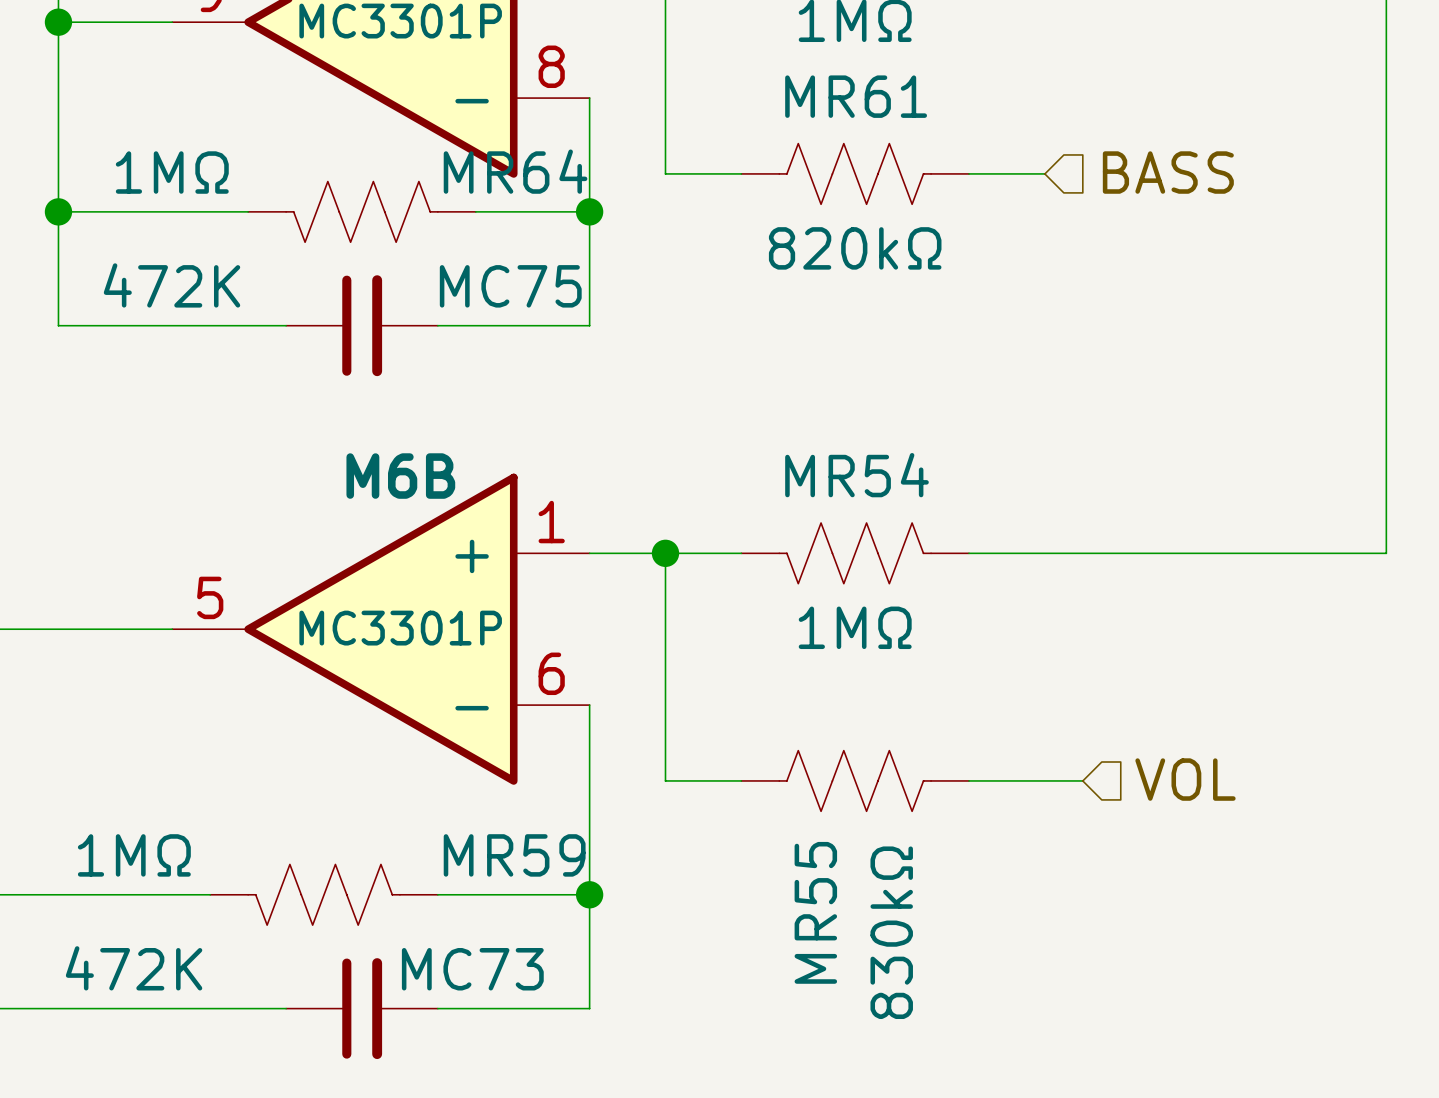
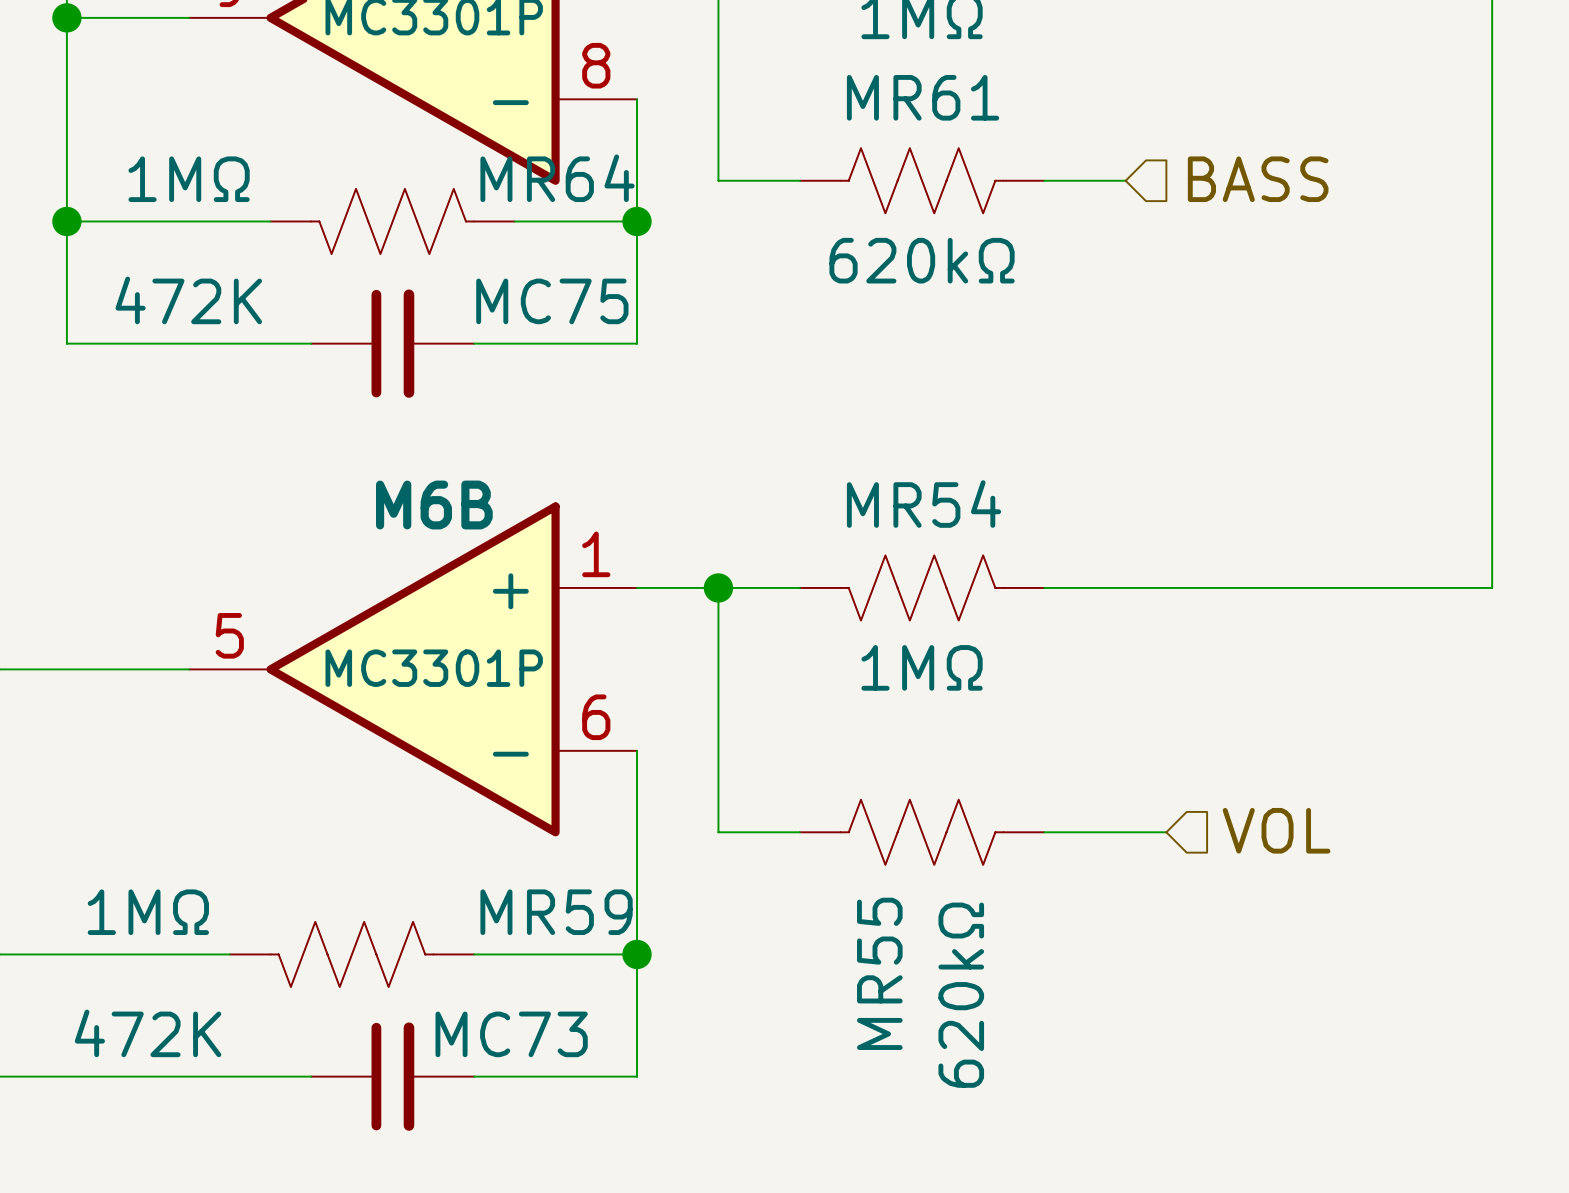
MR61 value: 820kΩ (855, 248) -> 620kΩ (922, 260)
MR55 value: 830kΩ (891, 932) -> 620kΩ (961, 995)

